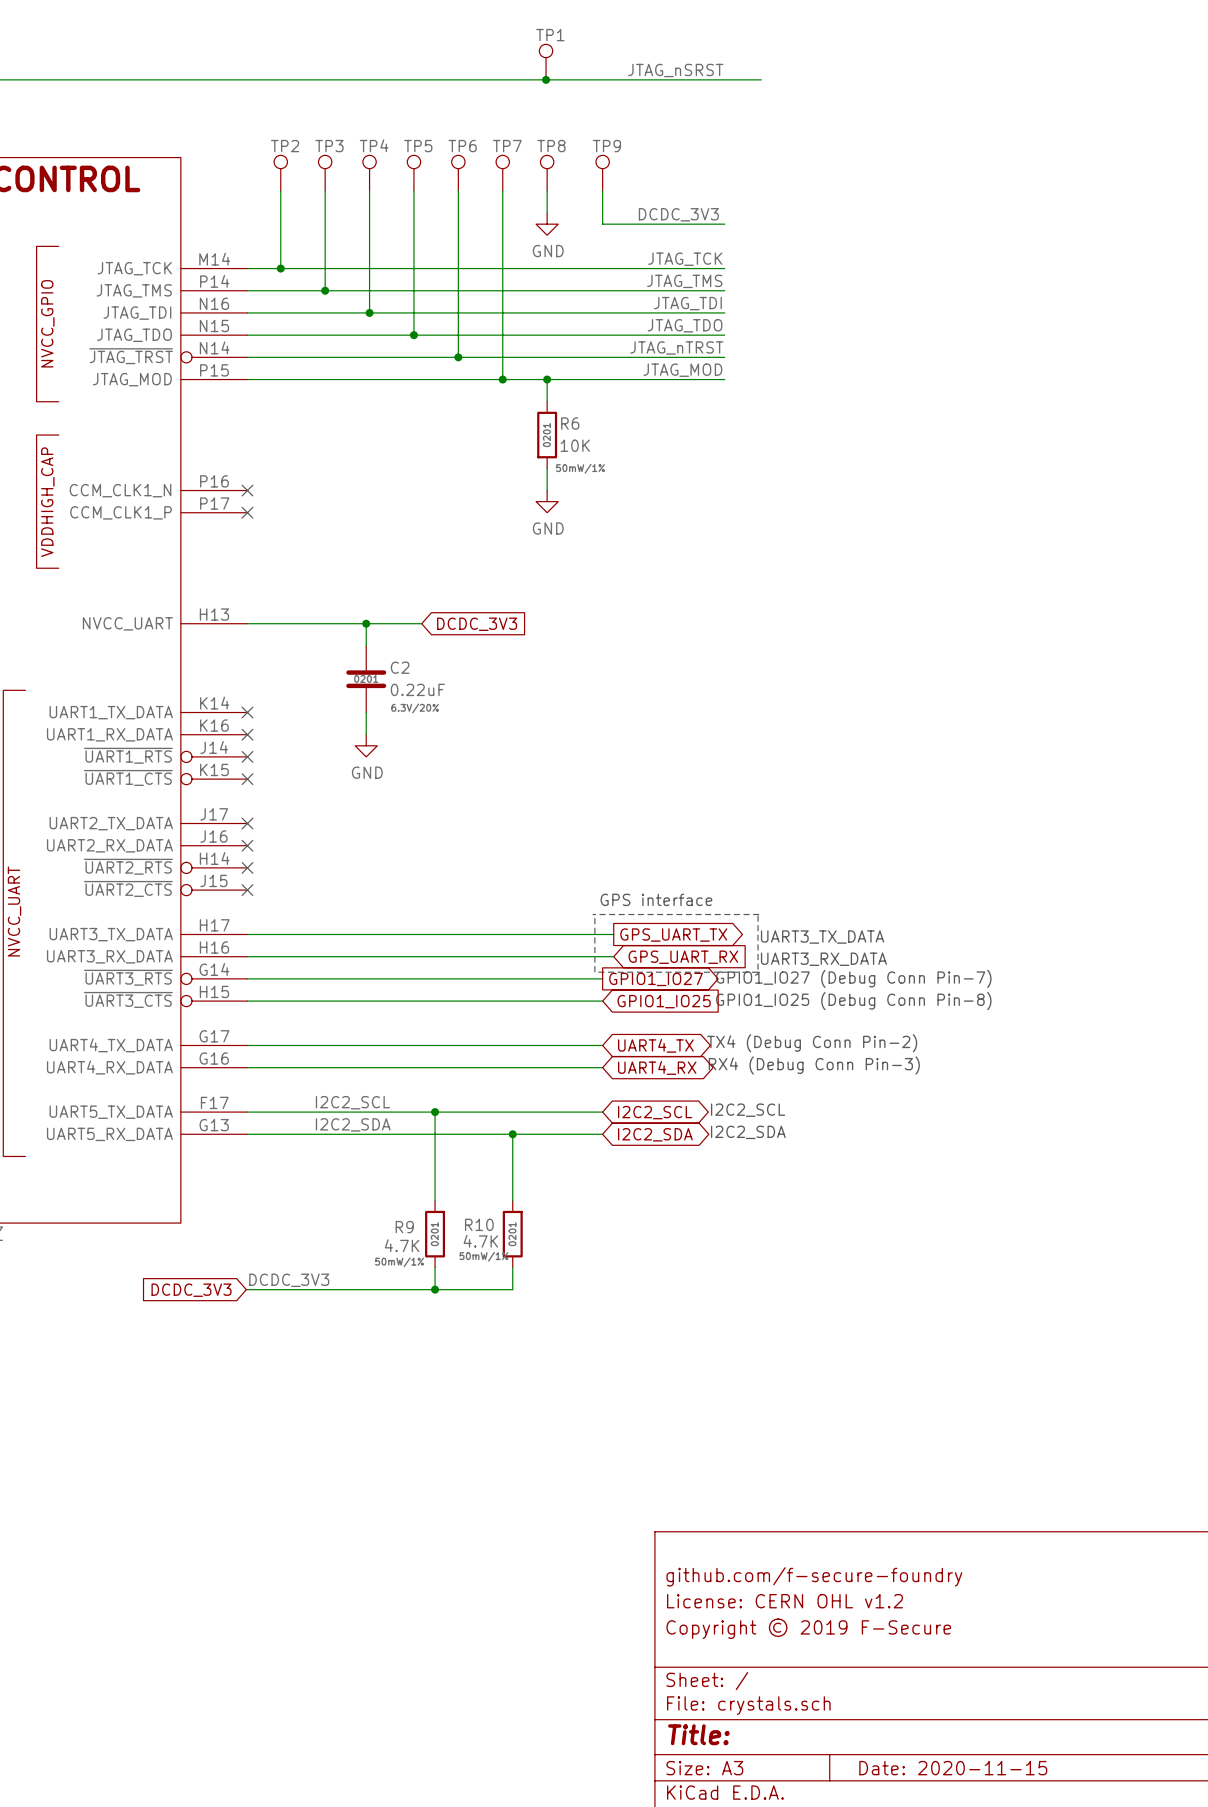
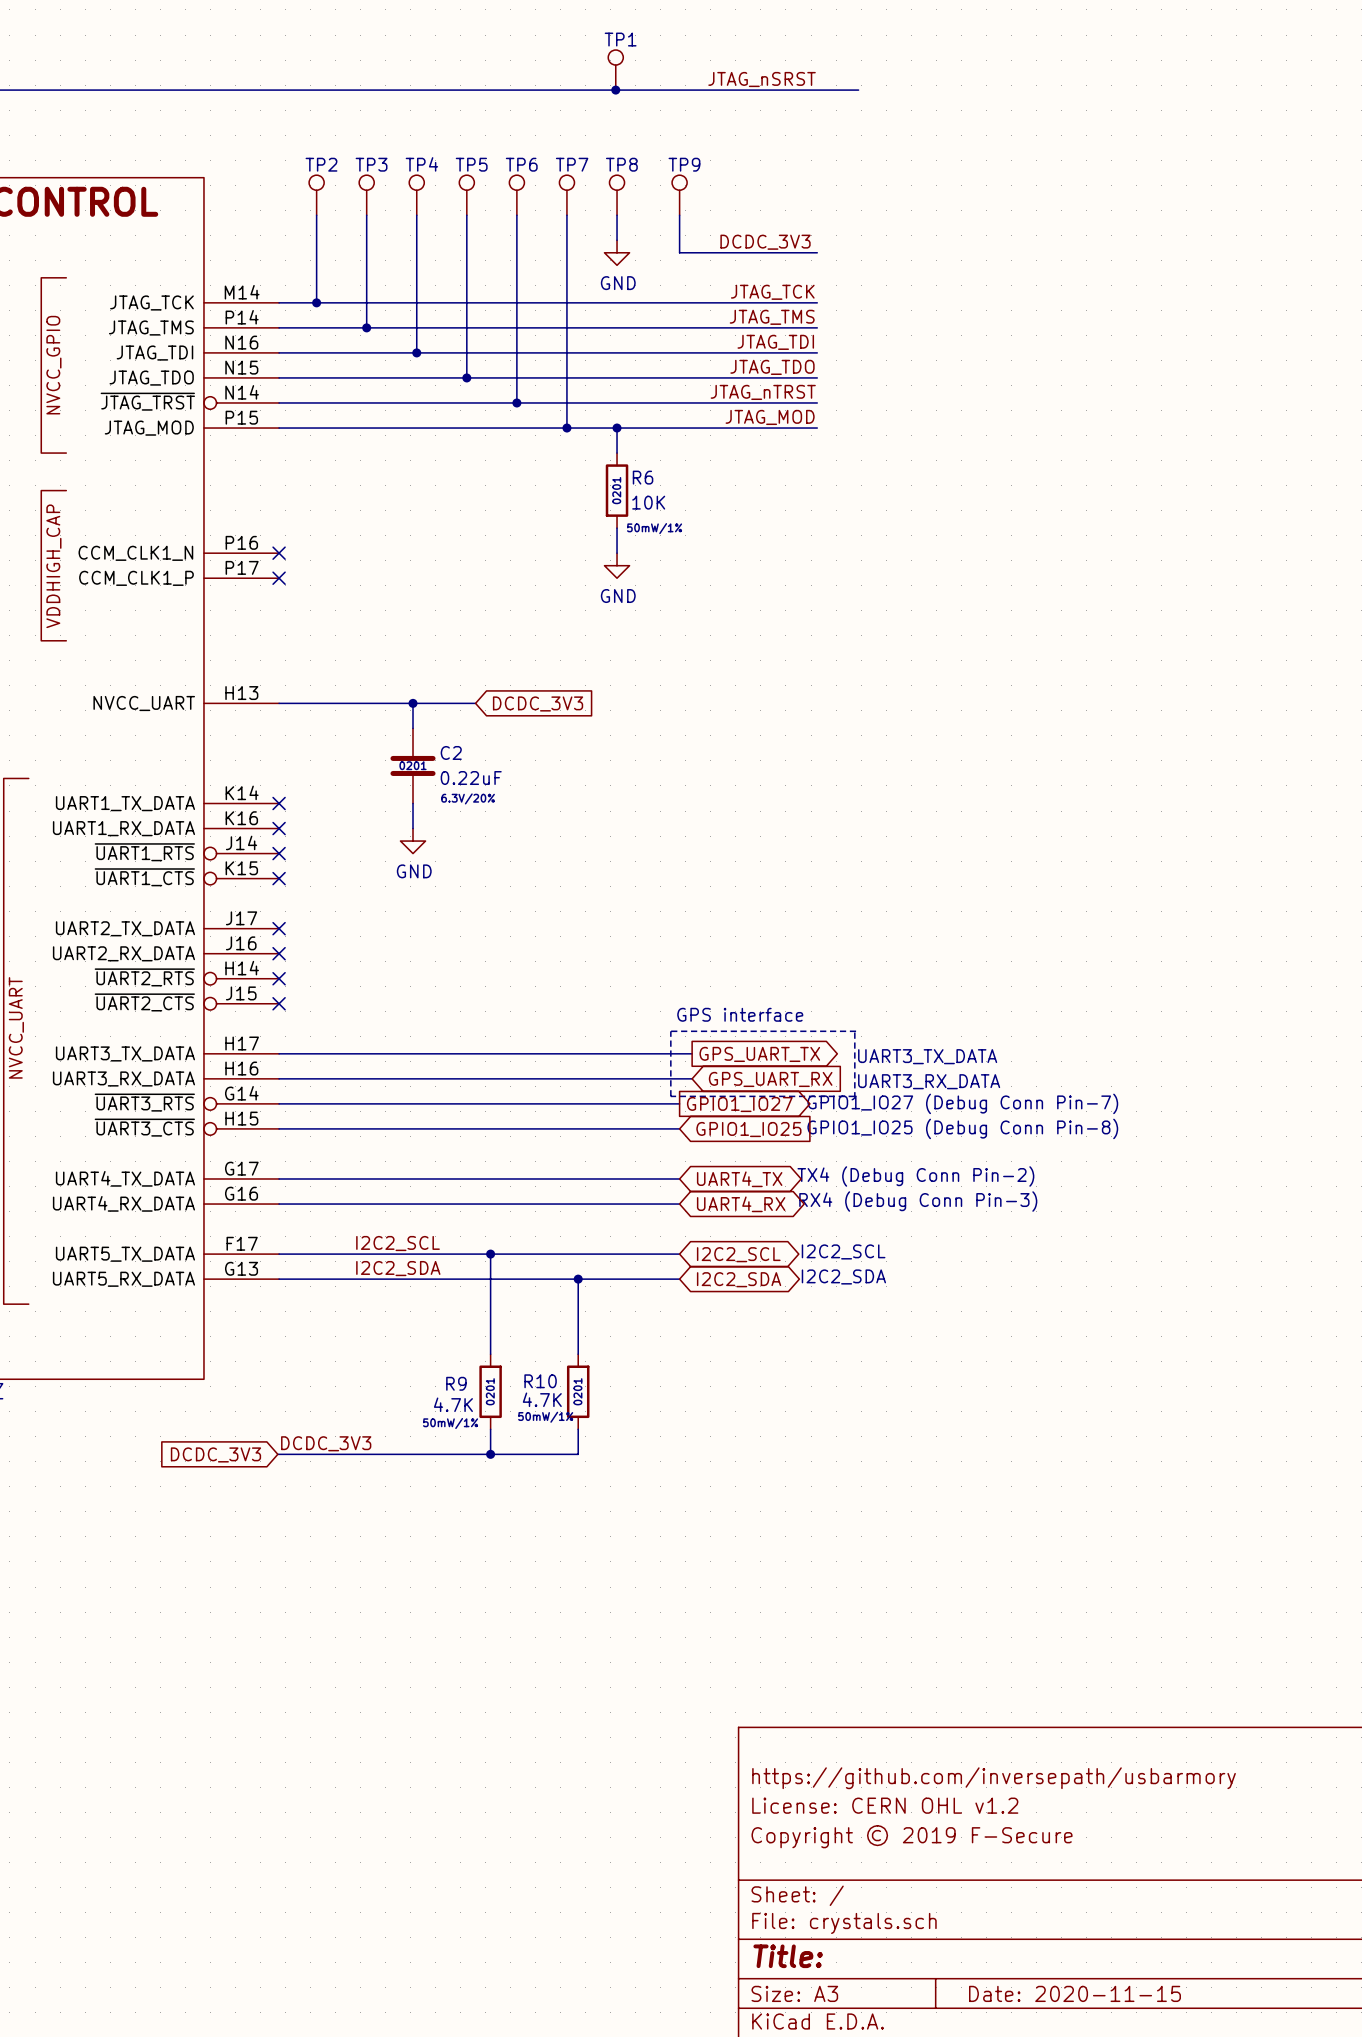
title block: github.com/f-secure-foundry (814, 1576) -> https://github.com/inversepath/usbarmory (994, 1778)

